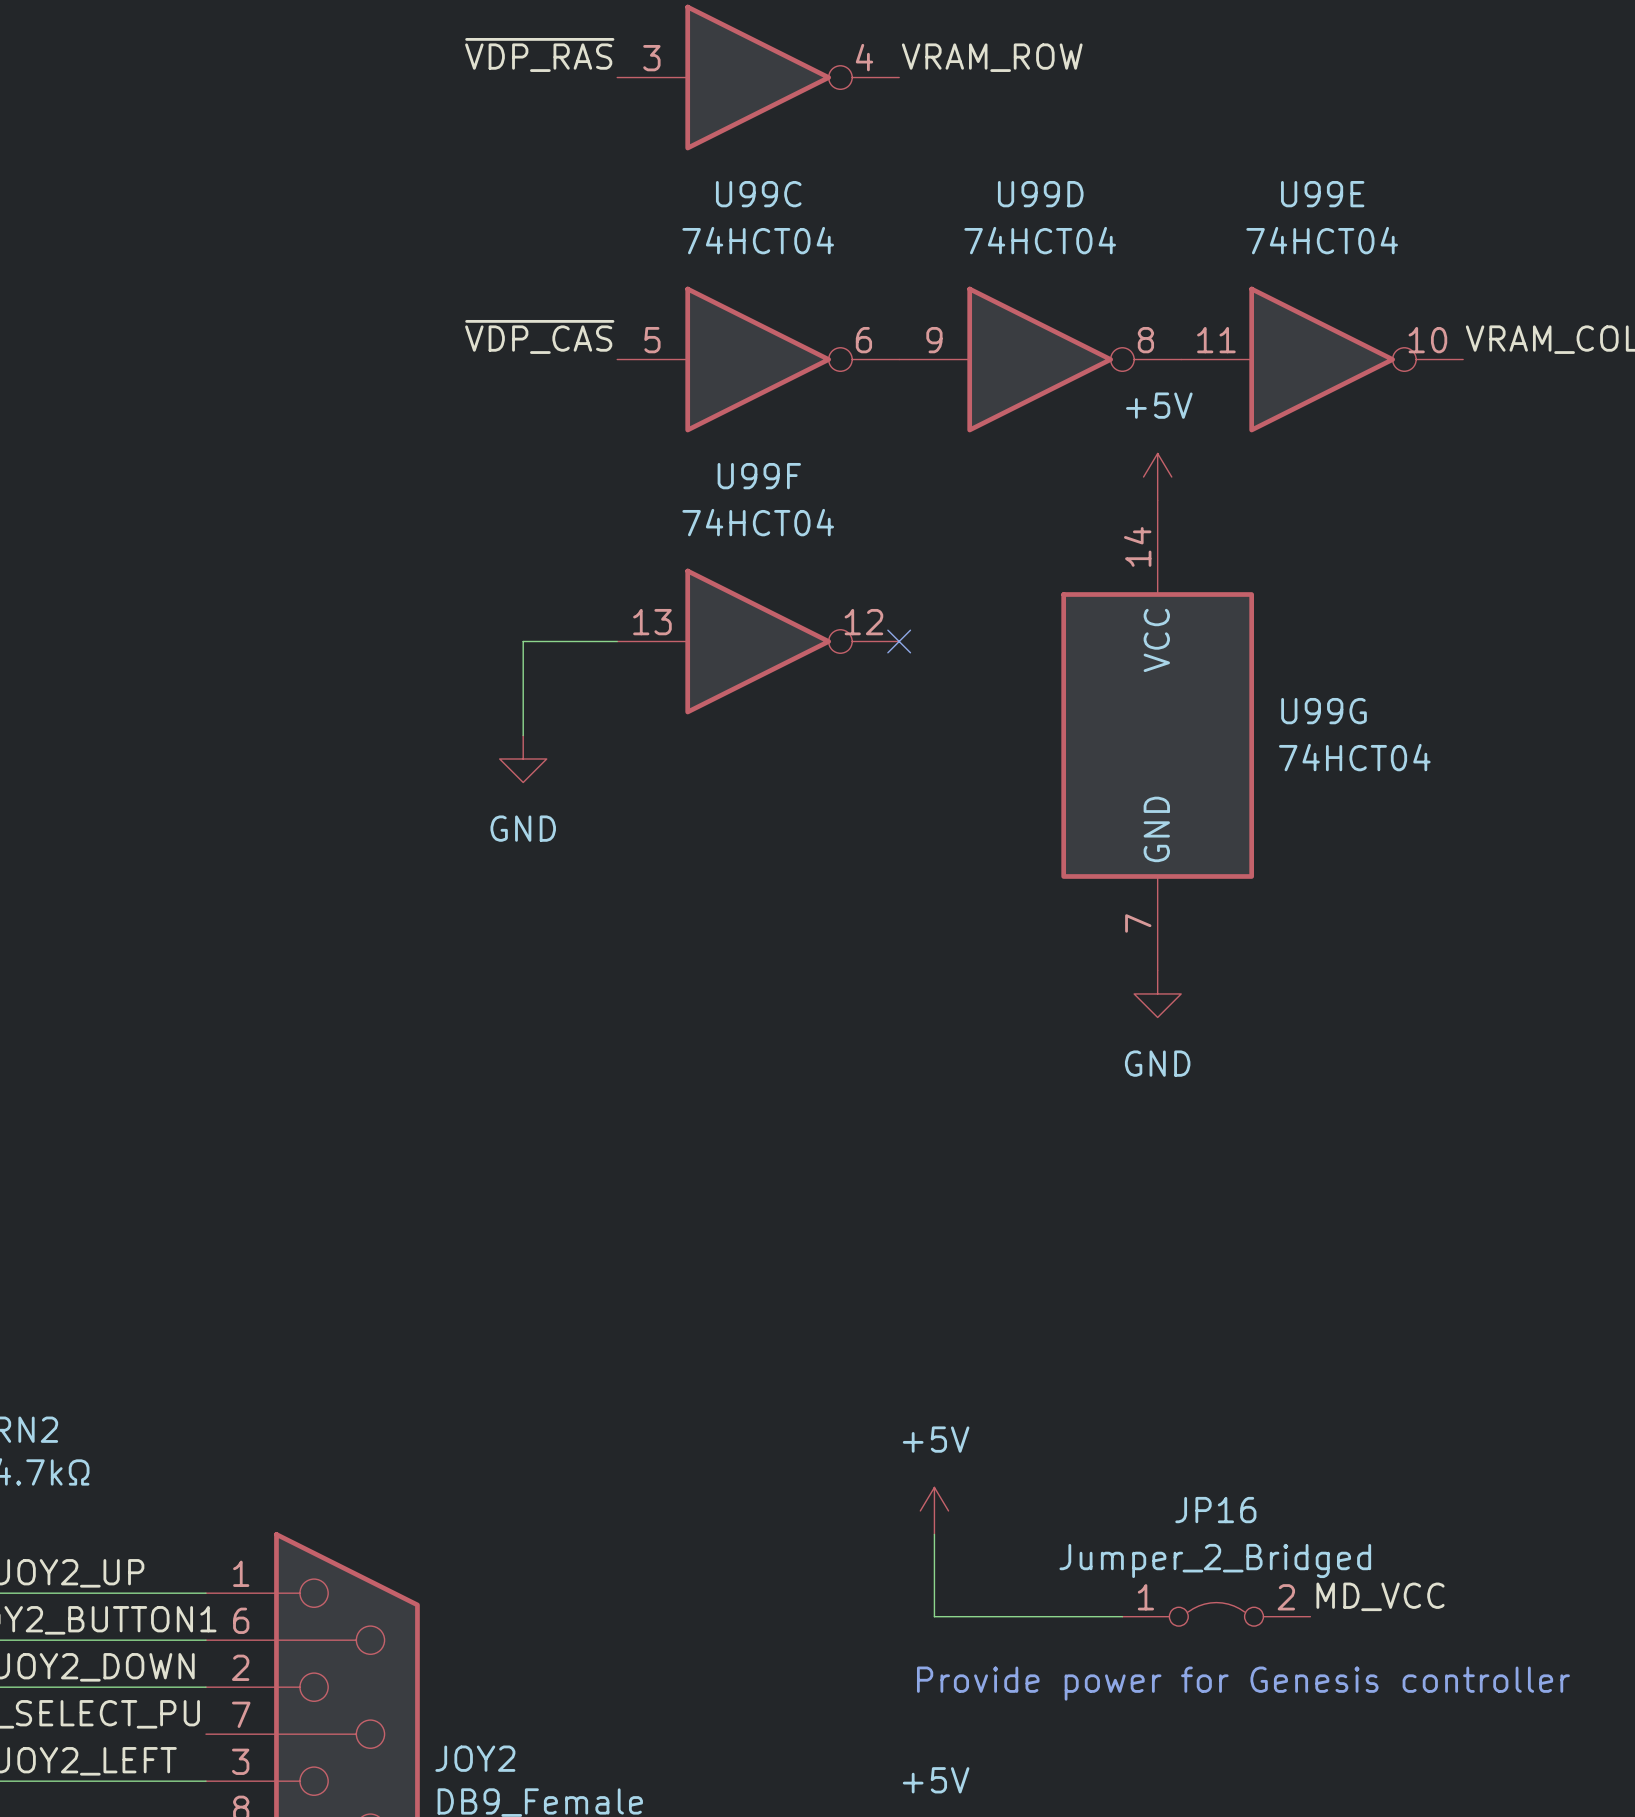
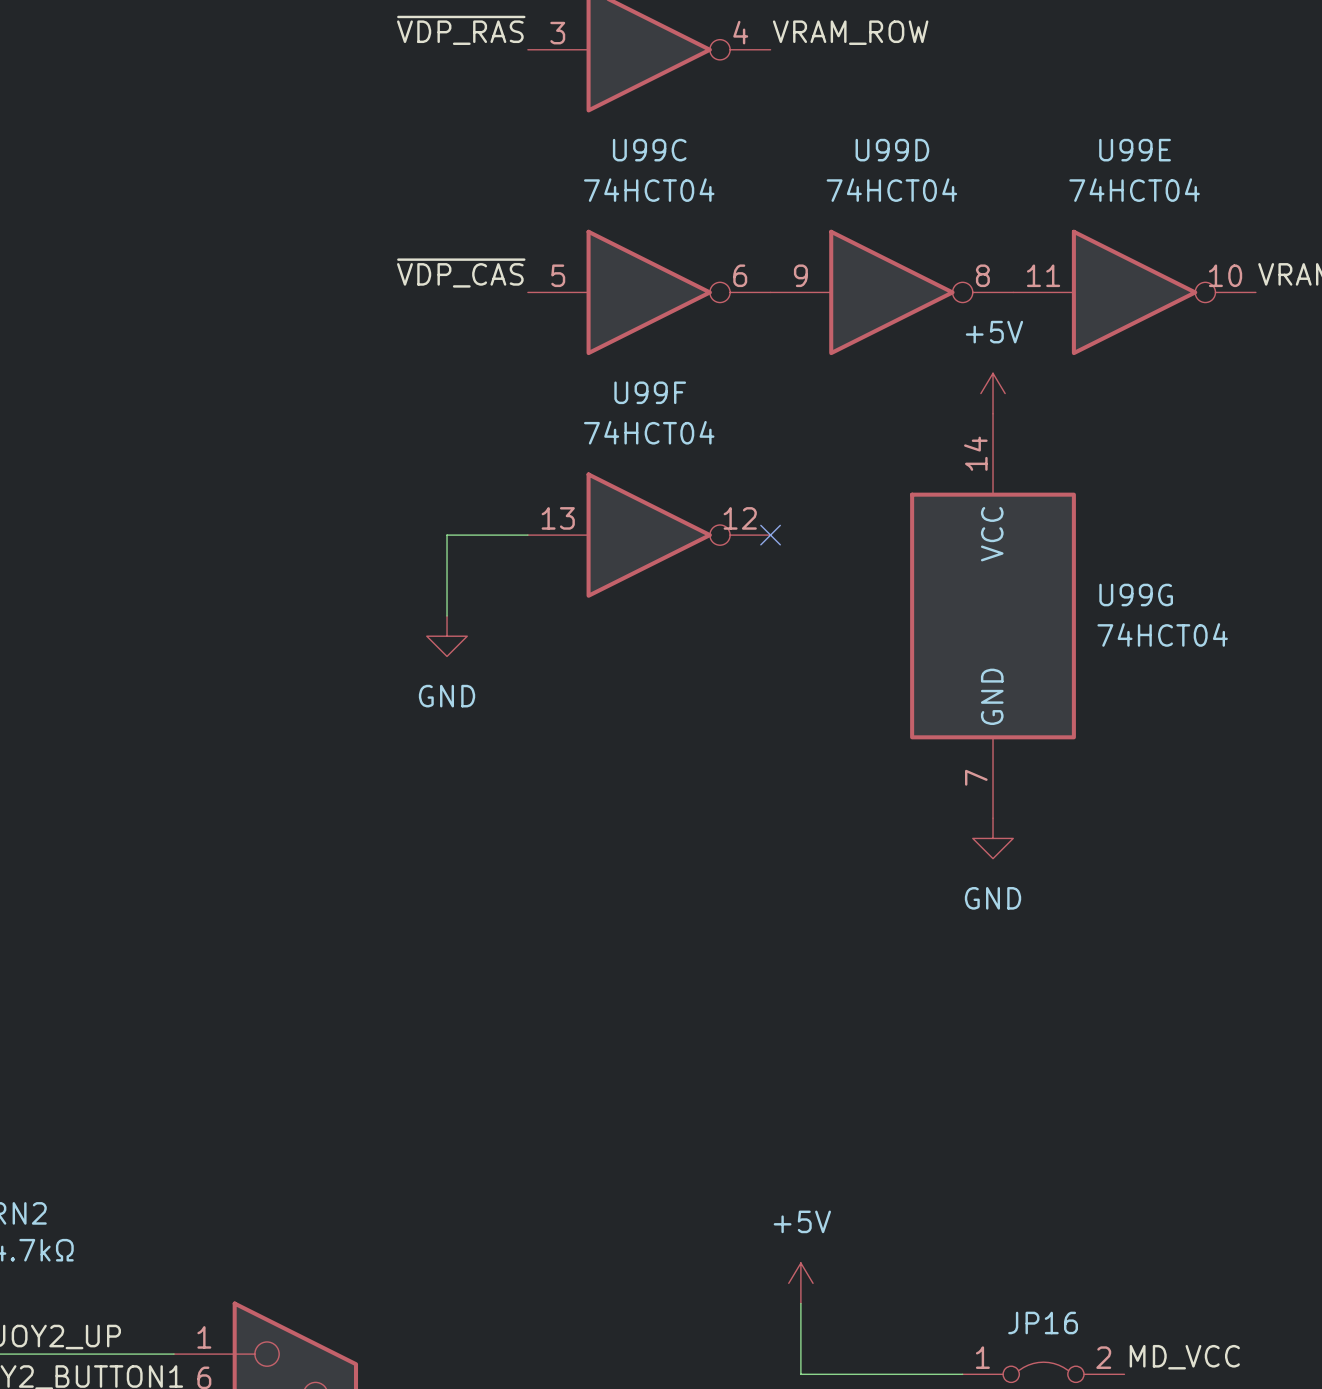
JP16 name position: JP16 (1215, 1510) -> JP16 (1043, 1323)
JP16 value: Jumper_2_Bridged (1215, 1560) -> none

